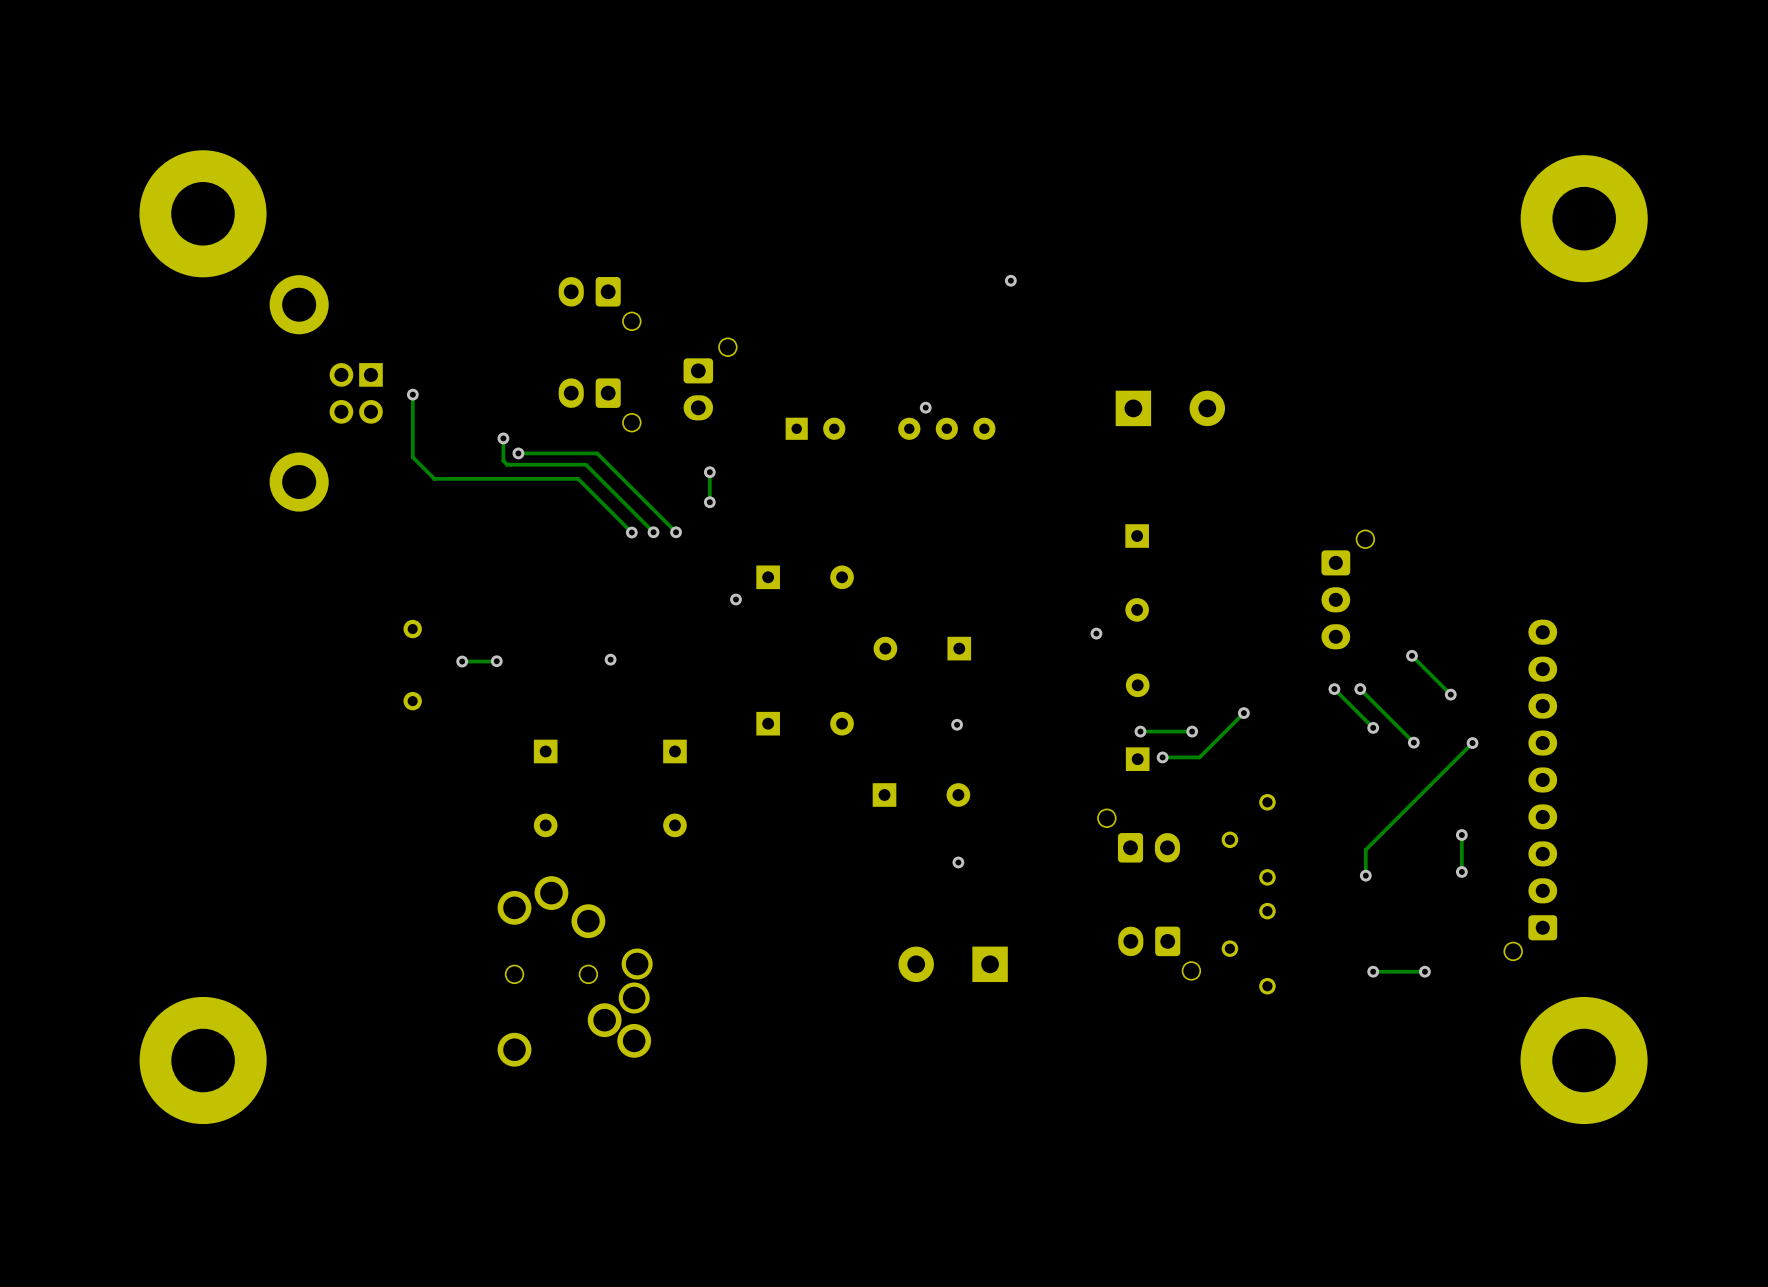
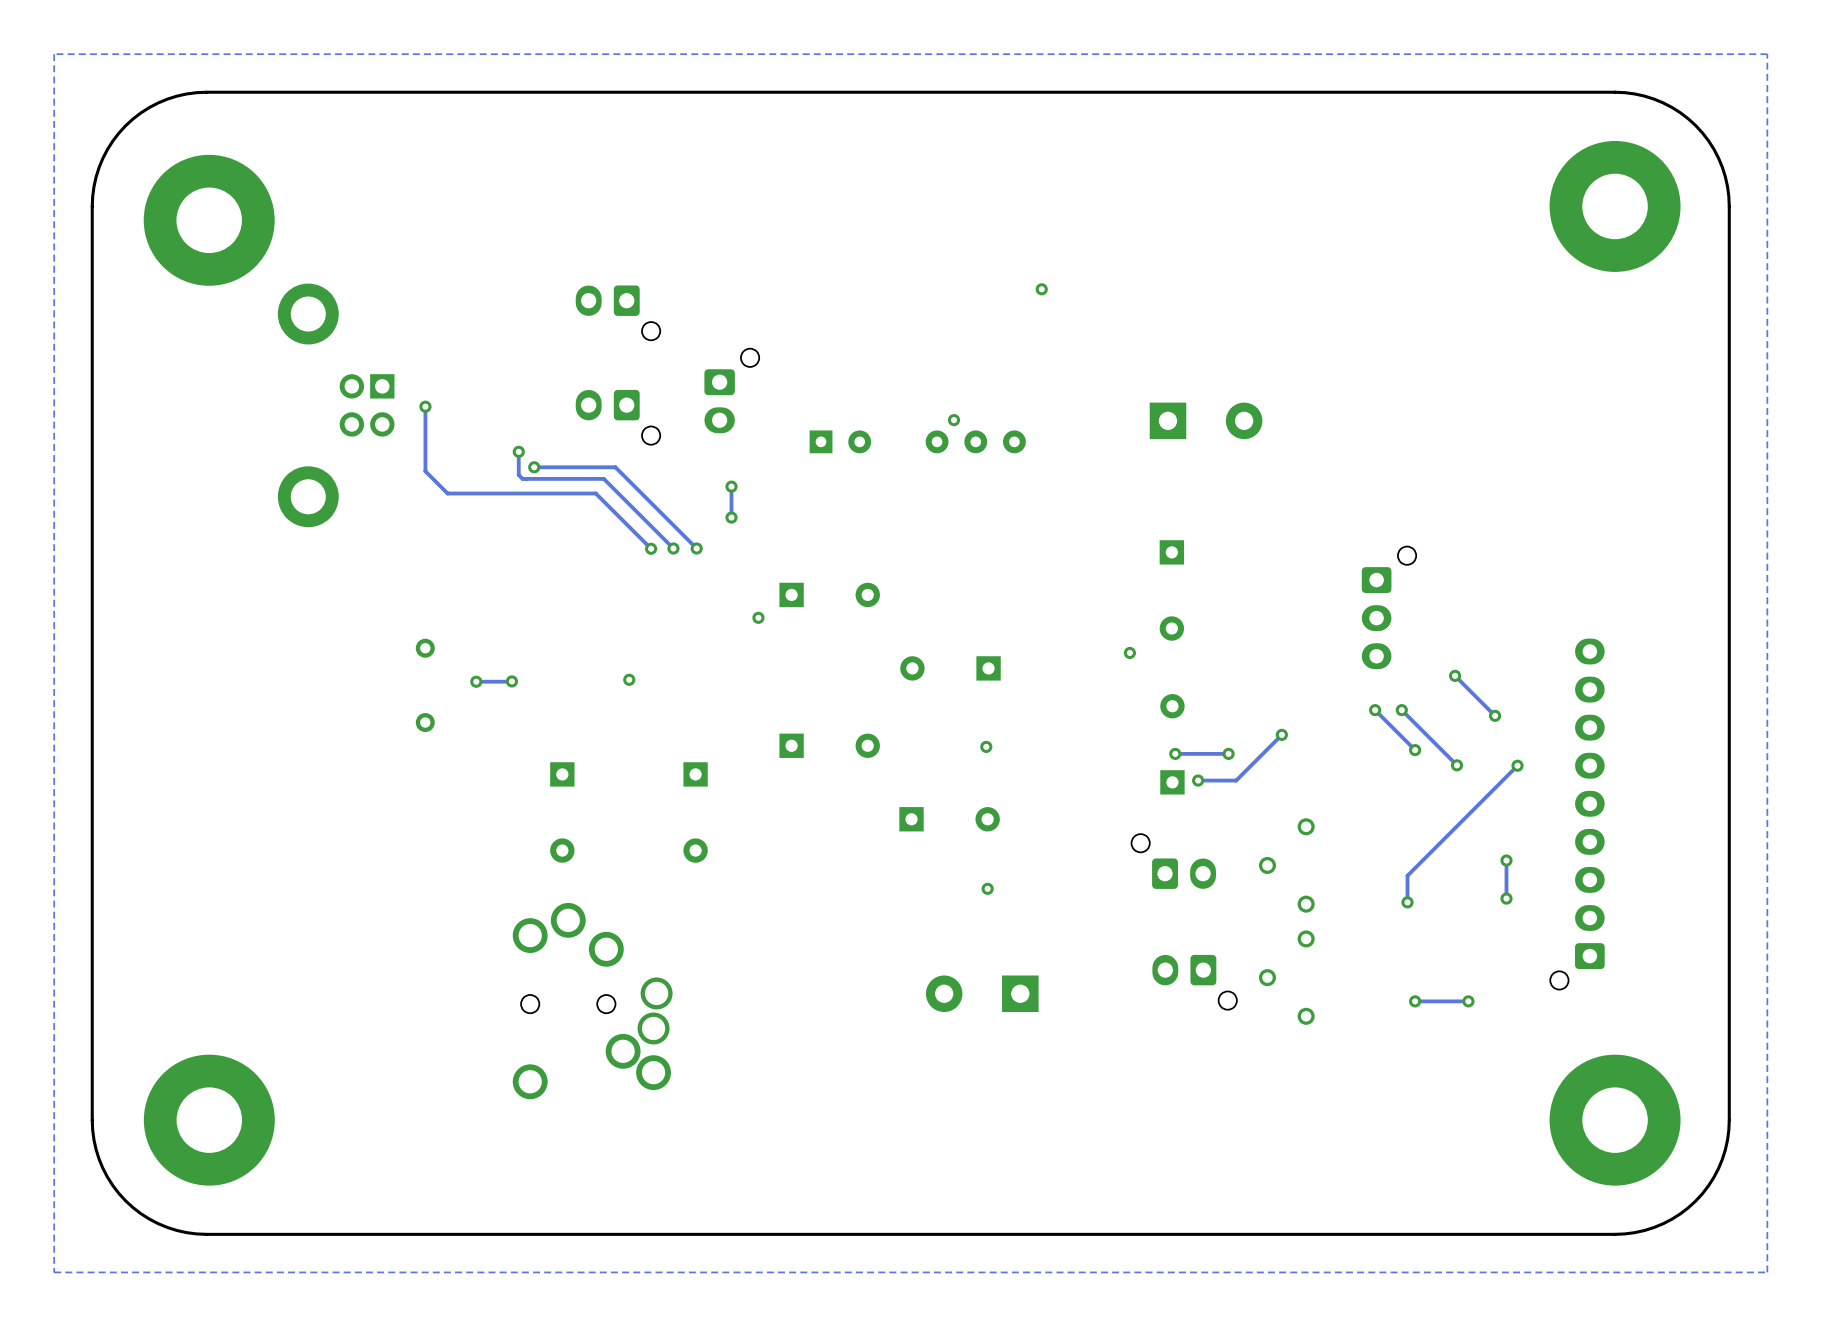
zone outline: none -> (1767, 54) (1767, 1272) (54, 1272) (54, 54) (1767, 54)
board edge: none -> (1615, 92) (206, 92) (186, 93) (167, 99) (140, 112) (118, 133) (107, 149) (96, 176) (92, 206) (92, 1120) (96, 1149) (102, 1168) (112, 1185) (133, 1207) (158, 1223) (186, 1232) (206, 1234) (1615, 1234) (1644, 1230) (1663, 1223) (1680, 1213) (1695, 1200) (1713, 1177) (1722, 1159) (1728, 1130) (1728, 196) (1725, 176) (1718, 158) (1702, 133) (1688, 118) (1672, 107) (1654, 99) (1634, 93) (1615, 92)
part position: (1584, 218) -> (1615, 206)
part position: (203, 1060) -> (209, 1120)
part position: (1584, 1060) -> (1615, 1120)

